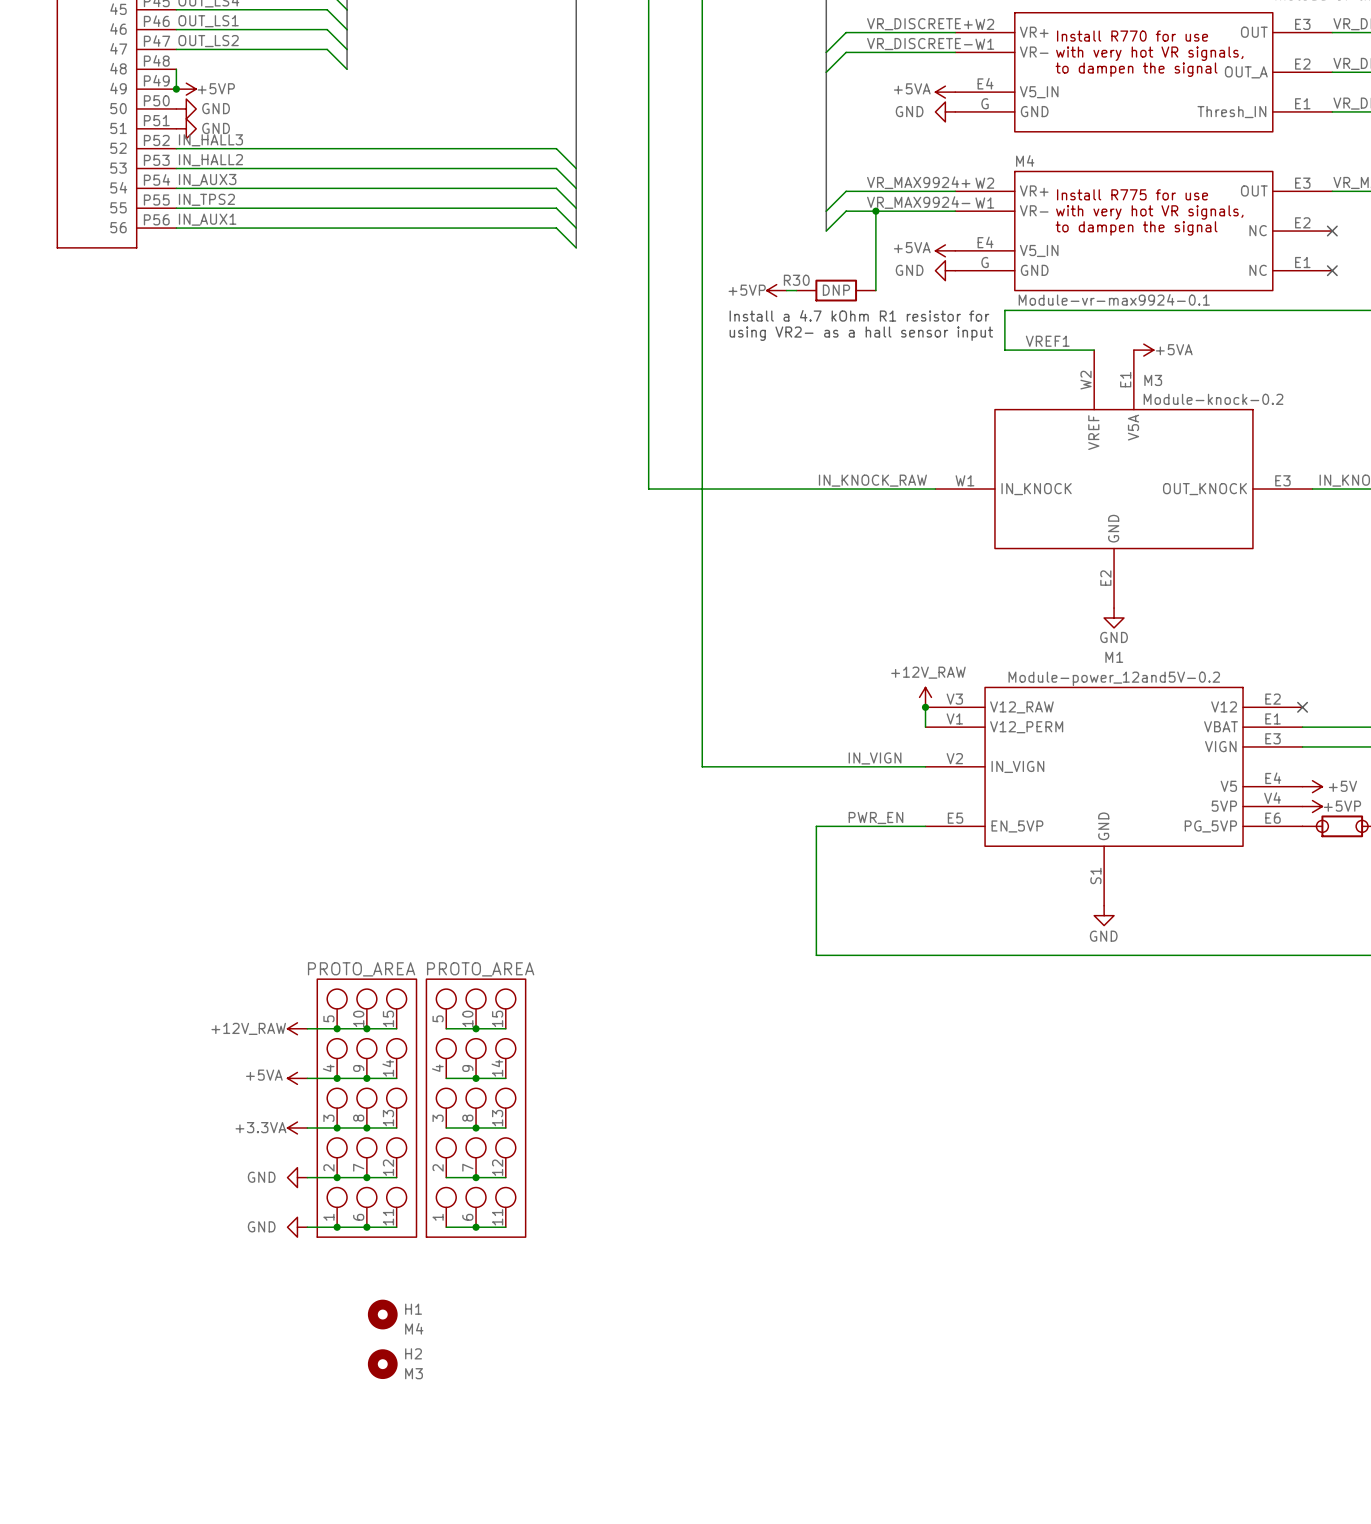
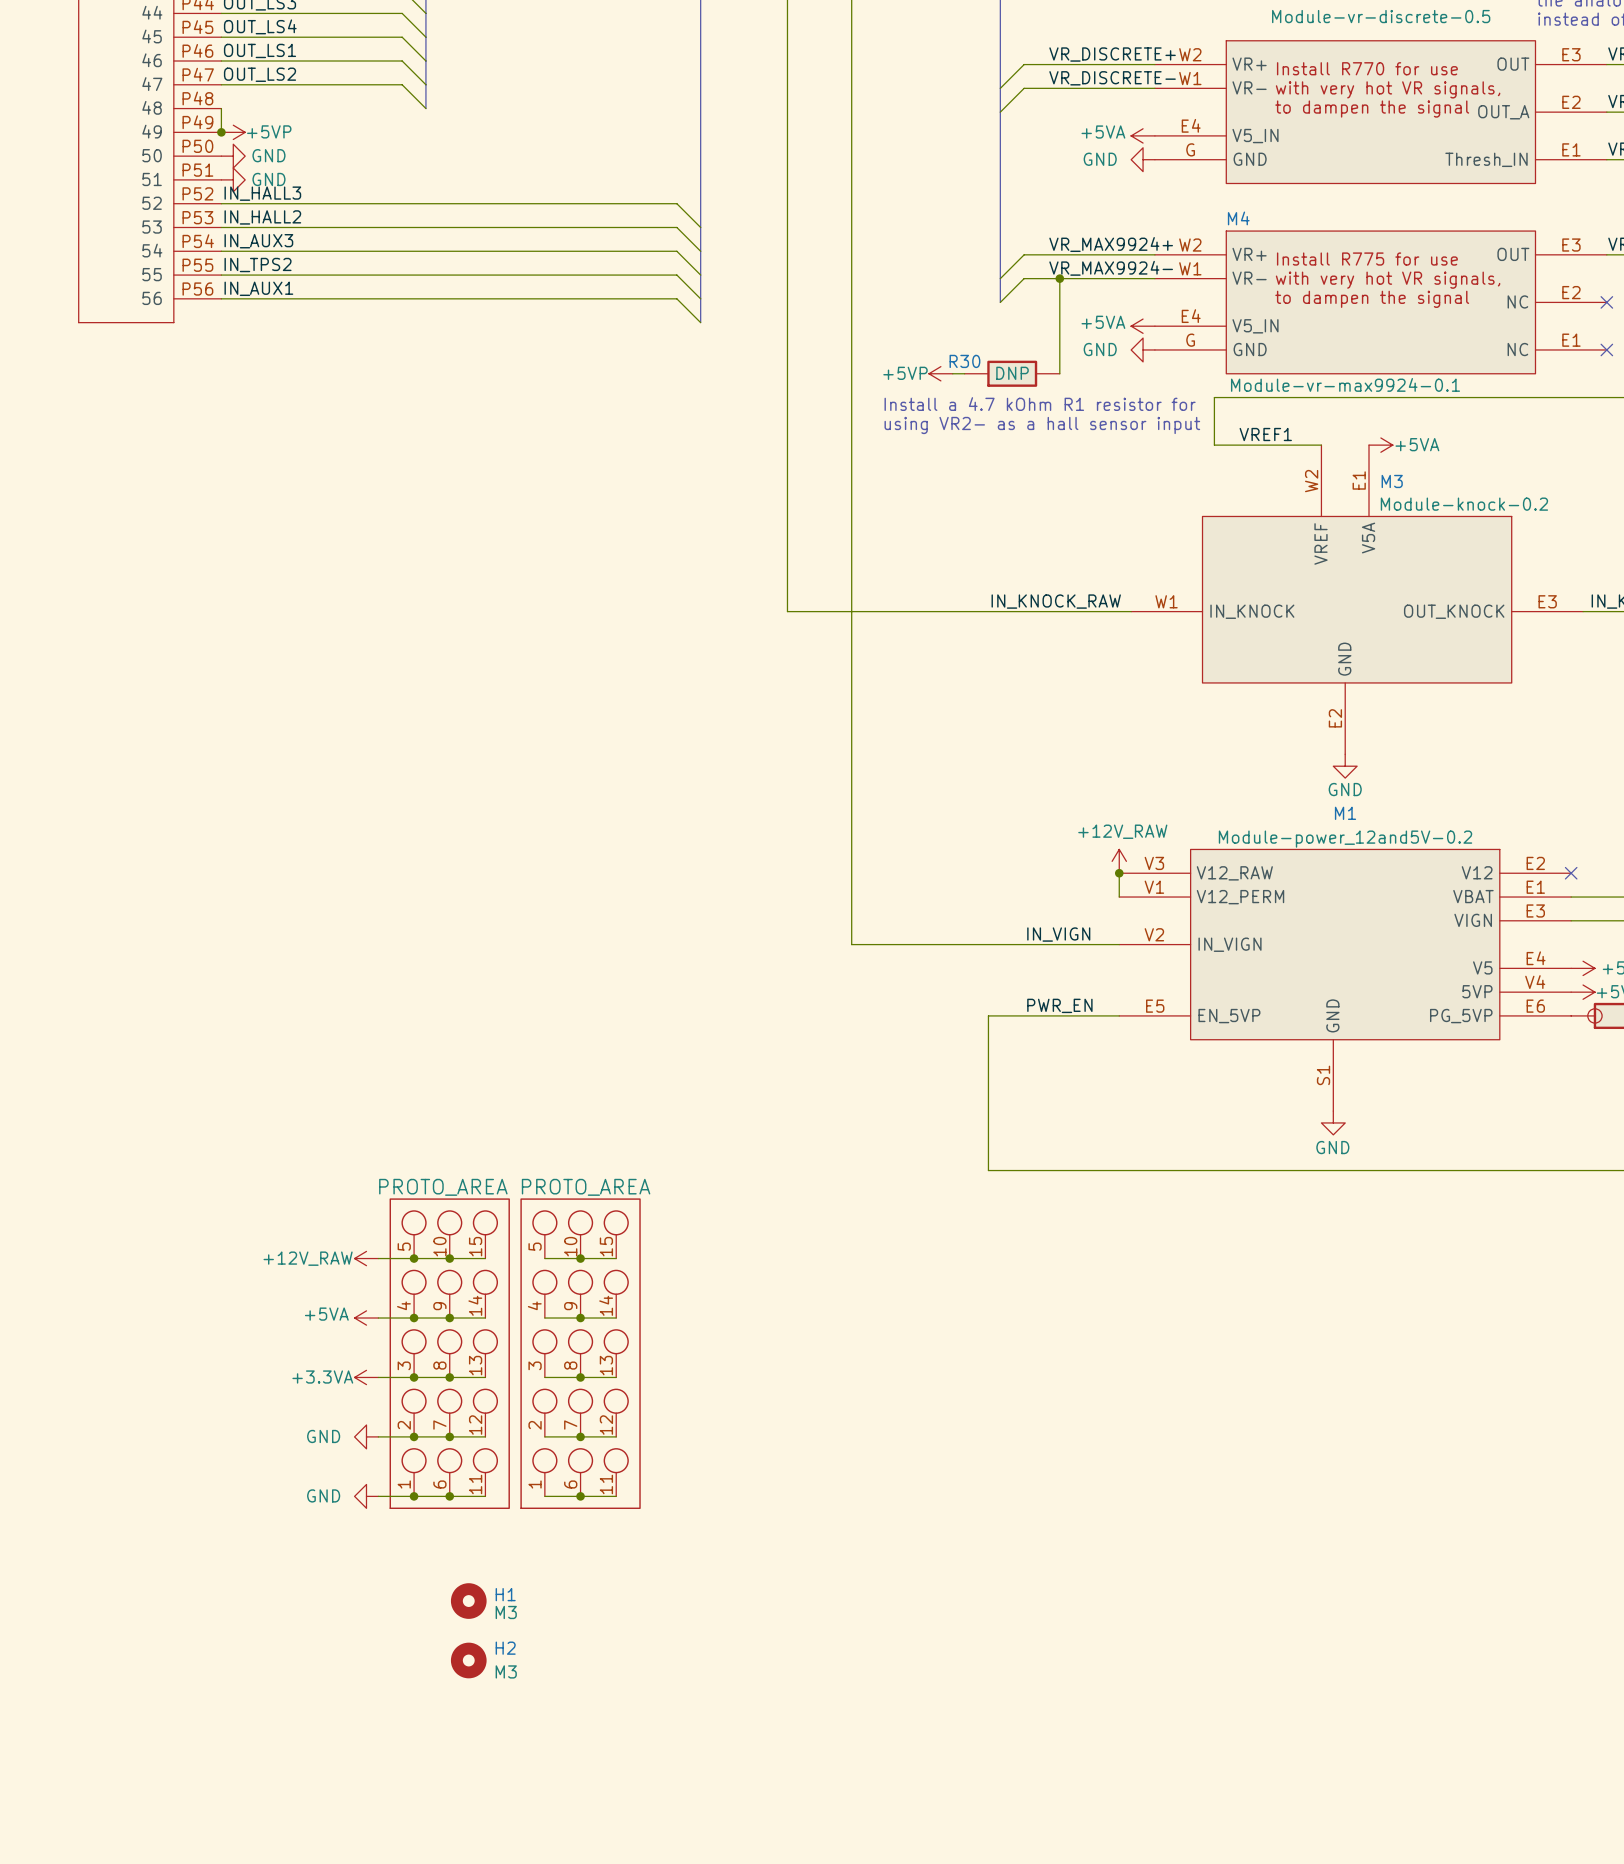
H1 value: M4 (414, 1328) -> M3 (506, 1612)

